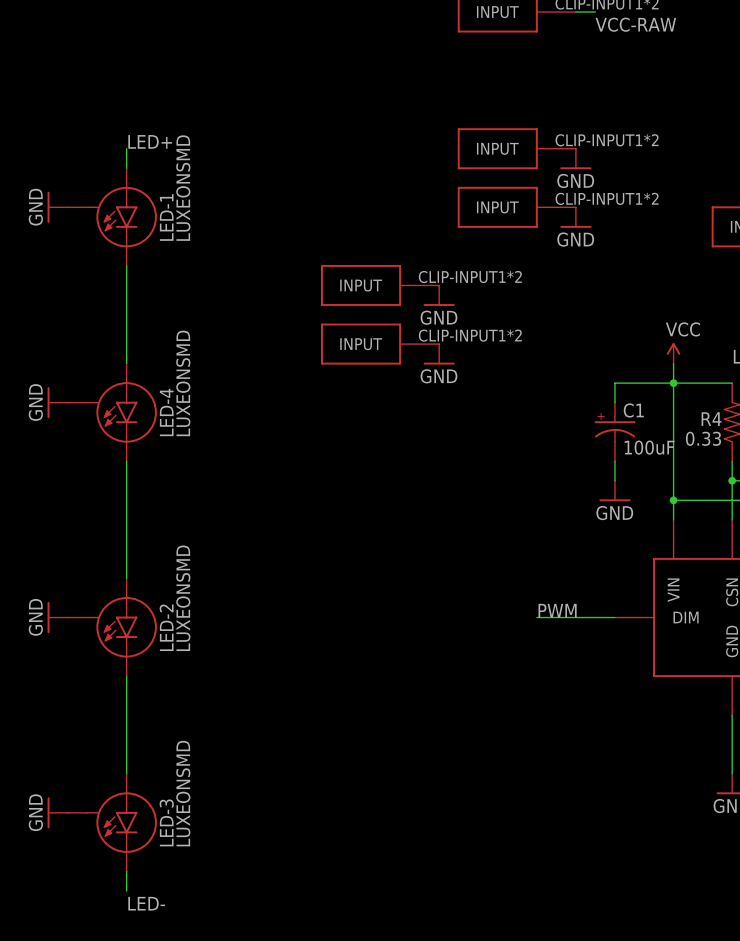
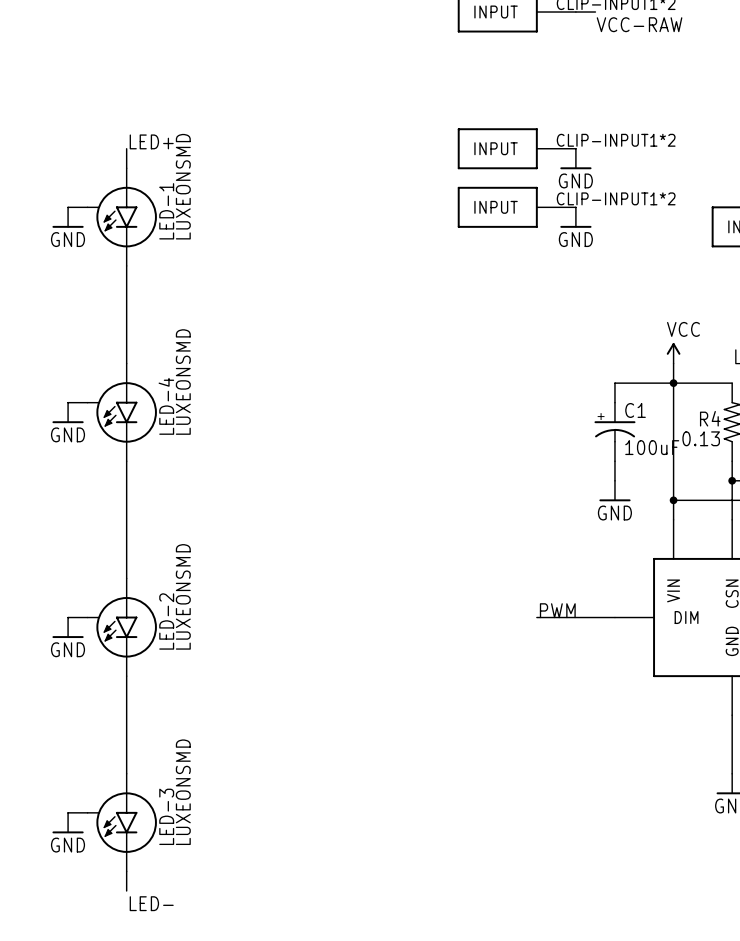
power symbol rotation: 0° (48, 207) -> 90° counterclockwise (68, 226)
part: (380, 285) -> none
power symbol: GND (439, 295) -> none
part: (380, 344) -> none
power symbol: GND (439, 354) -> none
power symbol rotation: 0° (48, 402) -> 90° counterclockwise (68, 422)
R4 value: 0.33 (703, 438) -> 0.13 (701, 438)
power symbol rotation: 0° (48, 617) -> 90° counterclockwise (68, 637)
power symbol rotation: 0° (48, 812) -> 90° counterclockwise (68, 832)

